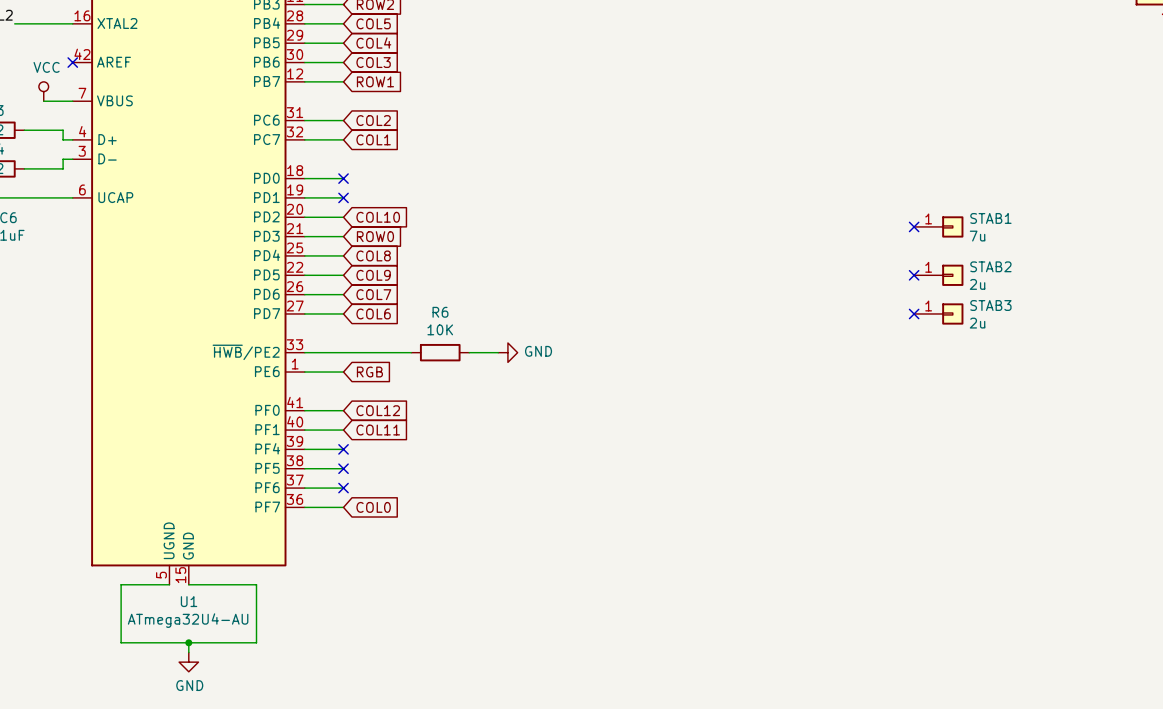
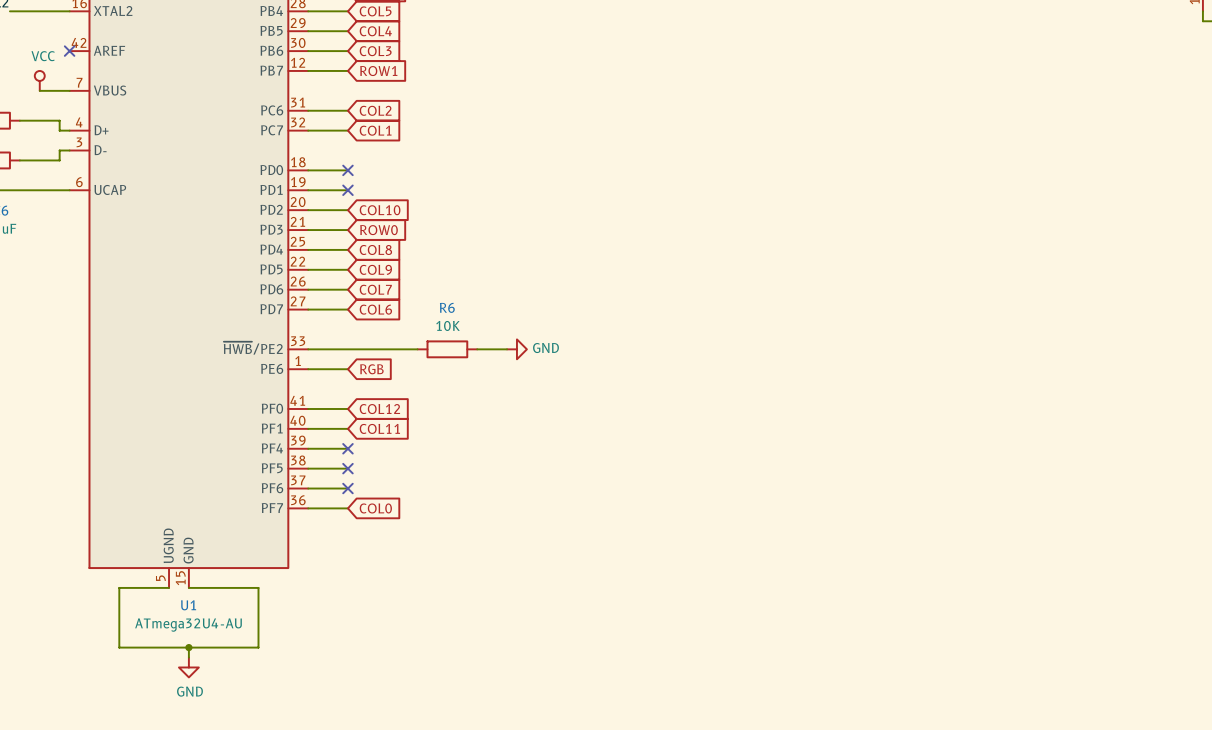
no-connect mark: (914, 226) -> none
STAB1: 7u (938, 226) -> none
no-connect mark: (914, 275) -> none
STAB2: 2u (938, 275) -> none
no-connect mark: (914, 313) -> none
STAB3: 2u (938, 313) -> none

